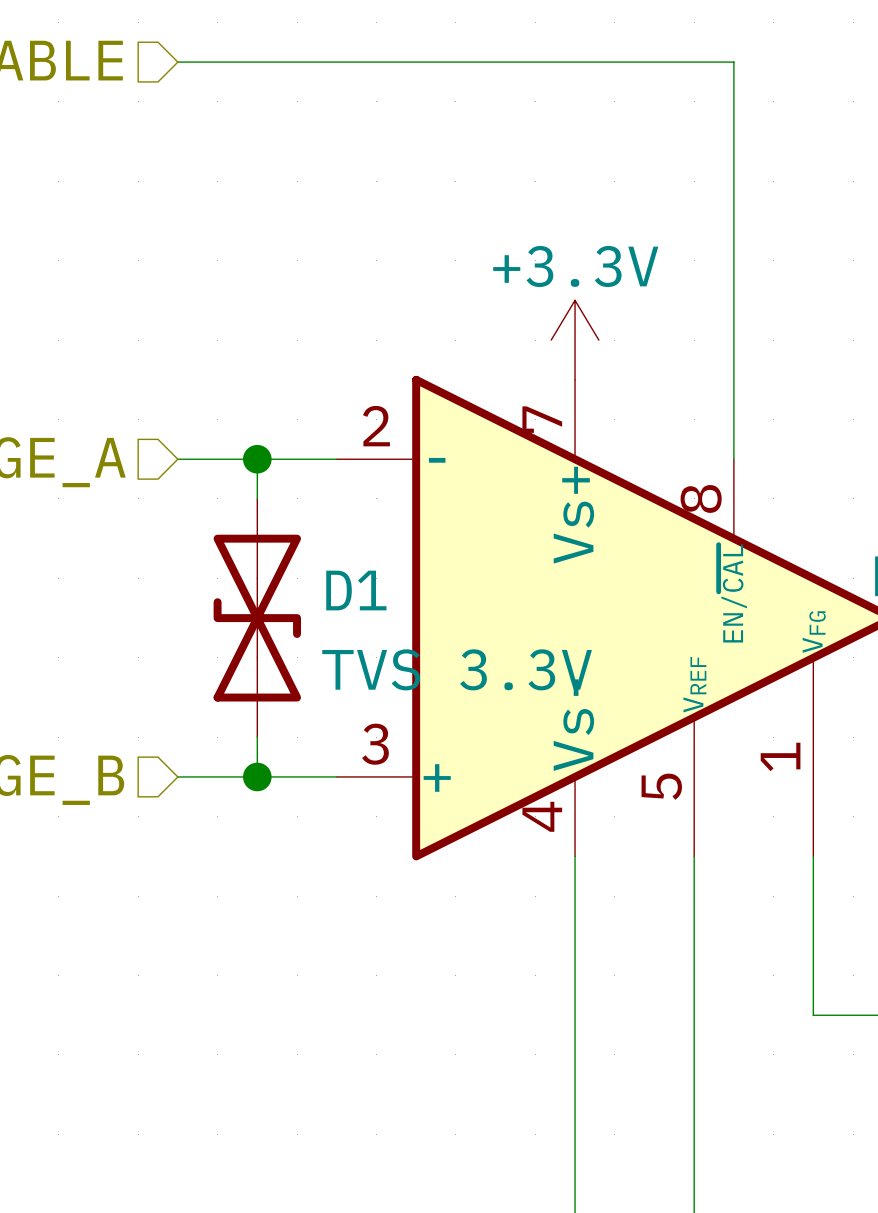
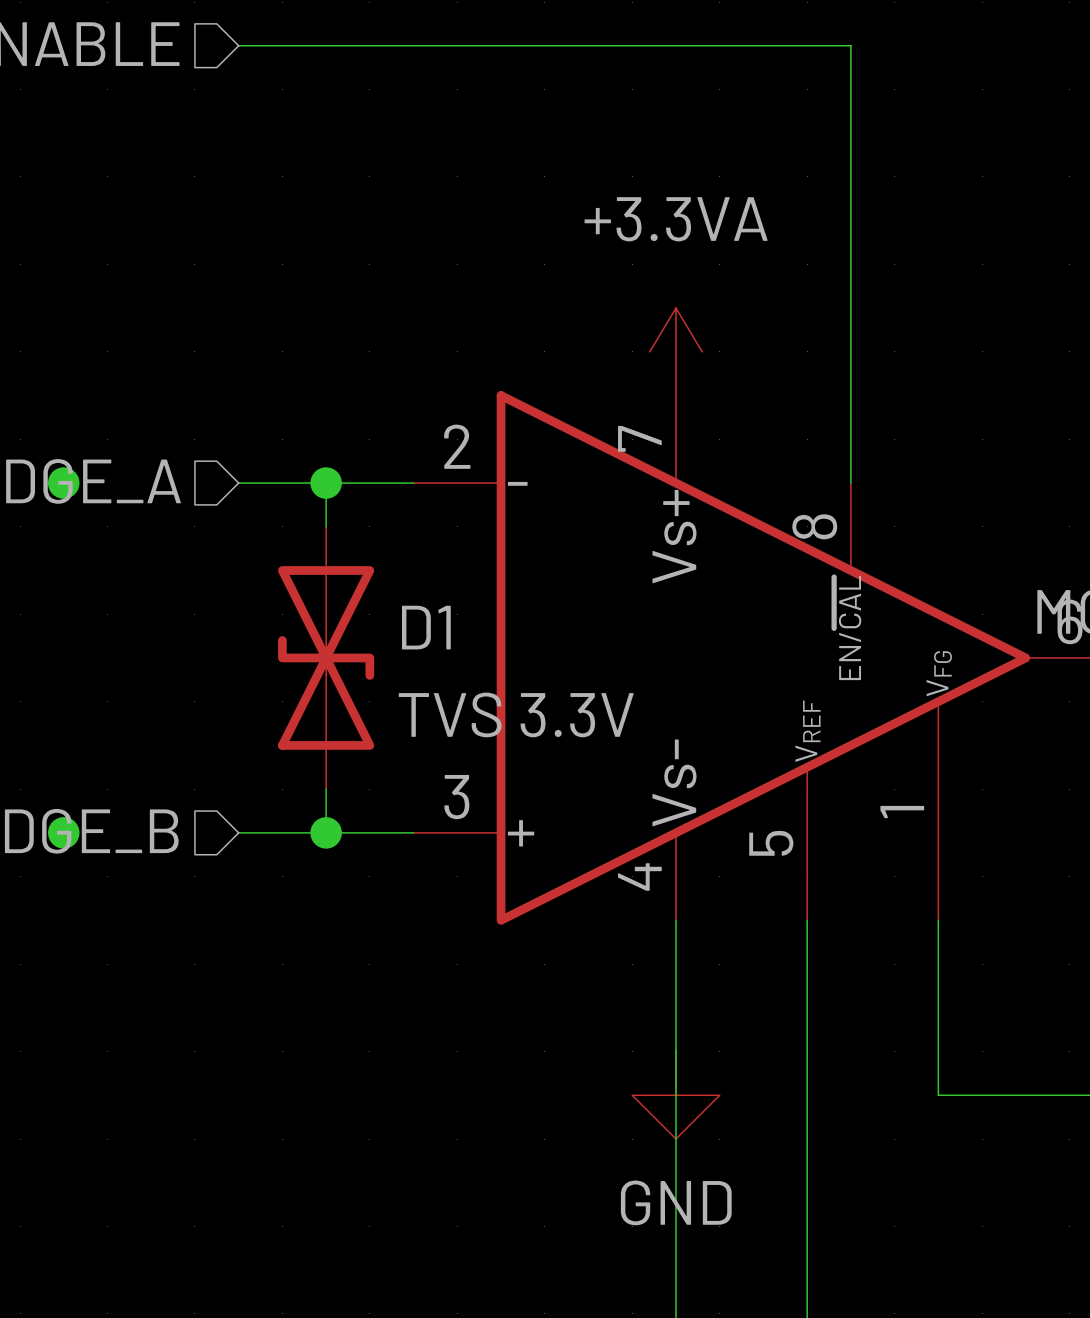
power symbol: +3.3V (575, 340) -> +3.3VA (675, 351)
junction: none -> (63, 483)
junction: none -> (63, 832)
power symbol: none -> GND (675, 1095)

